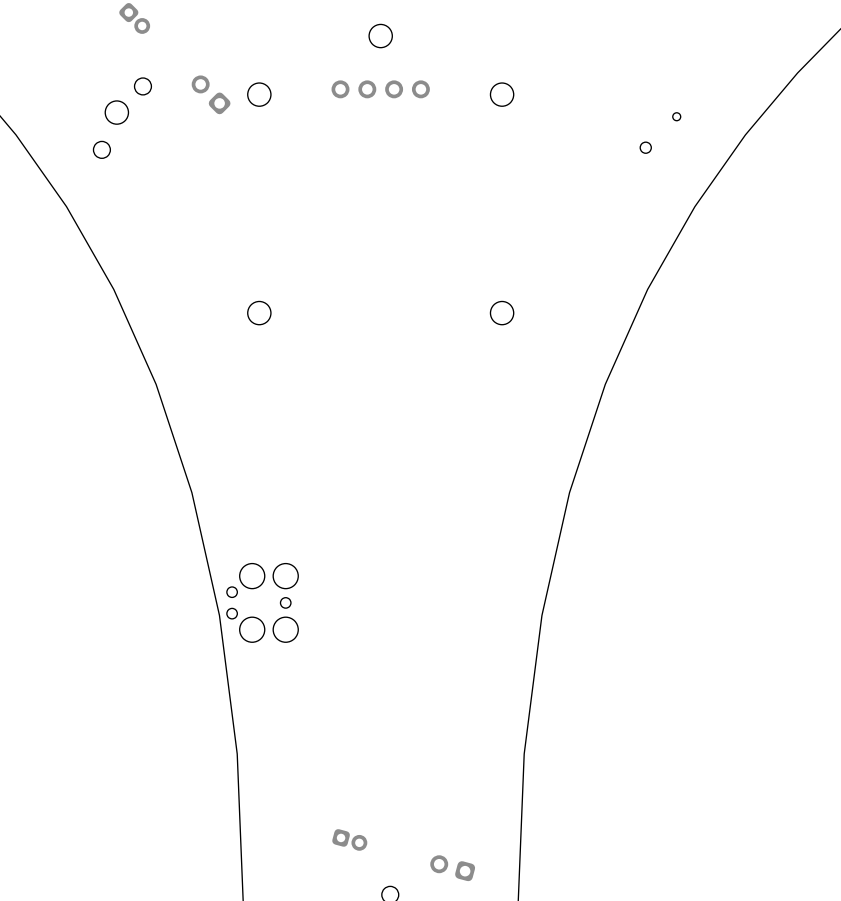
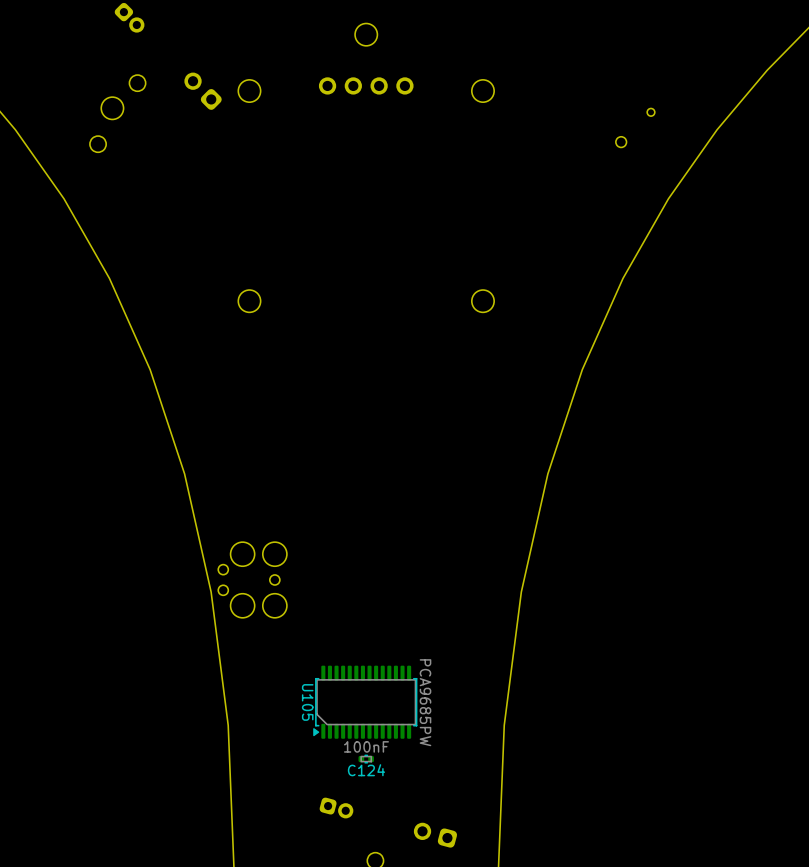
U105: none -> PCA9685PW (365, 702)
C124: none -> 100nF (366, 759)

